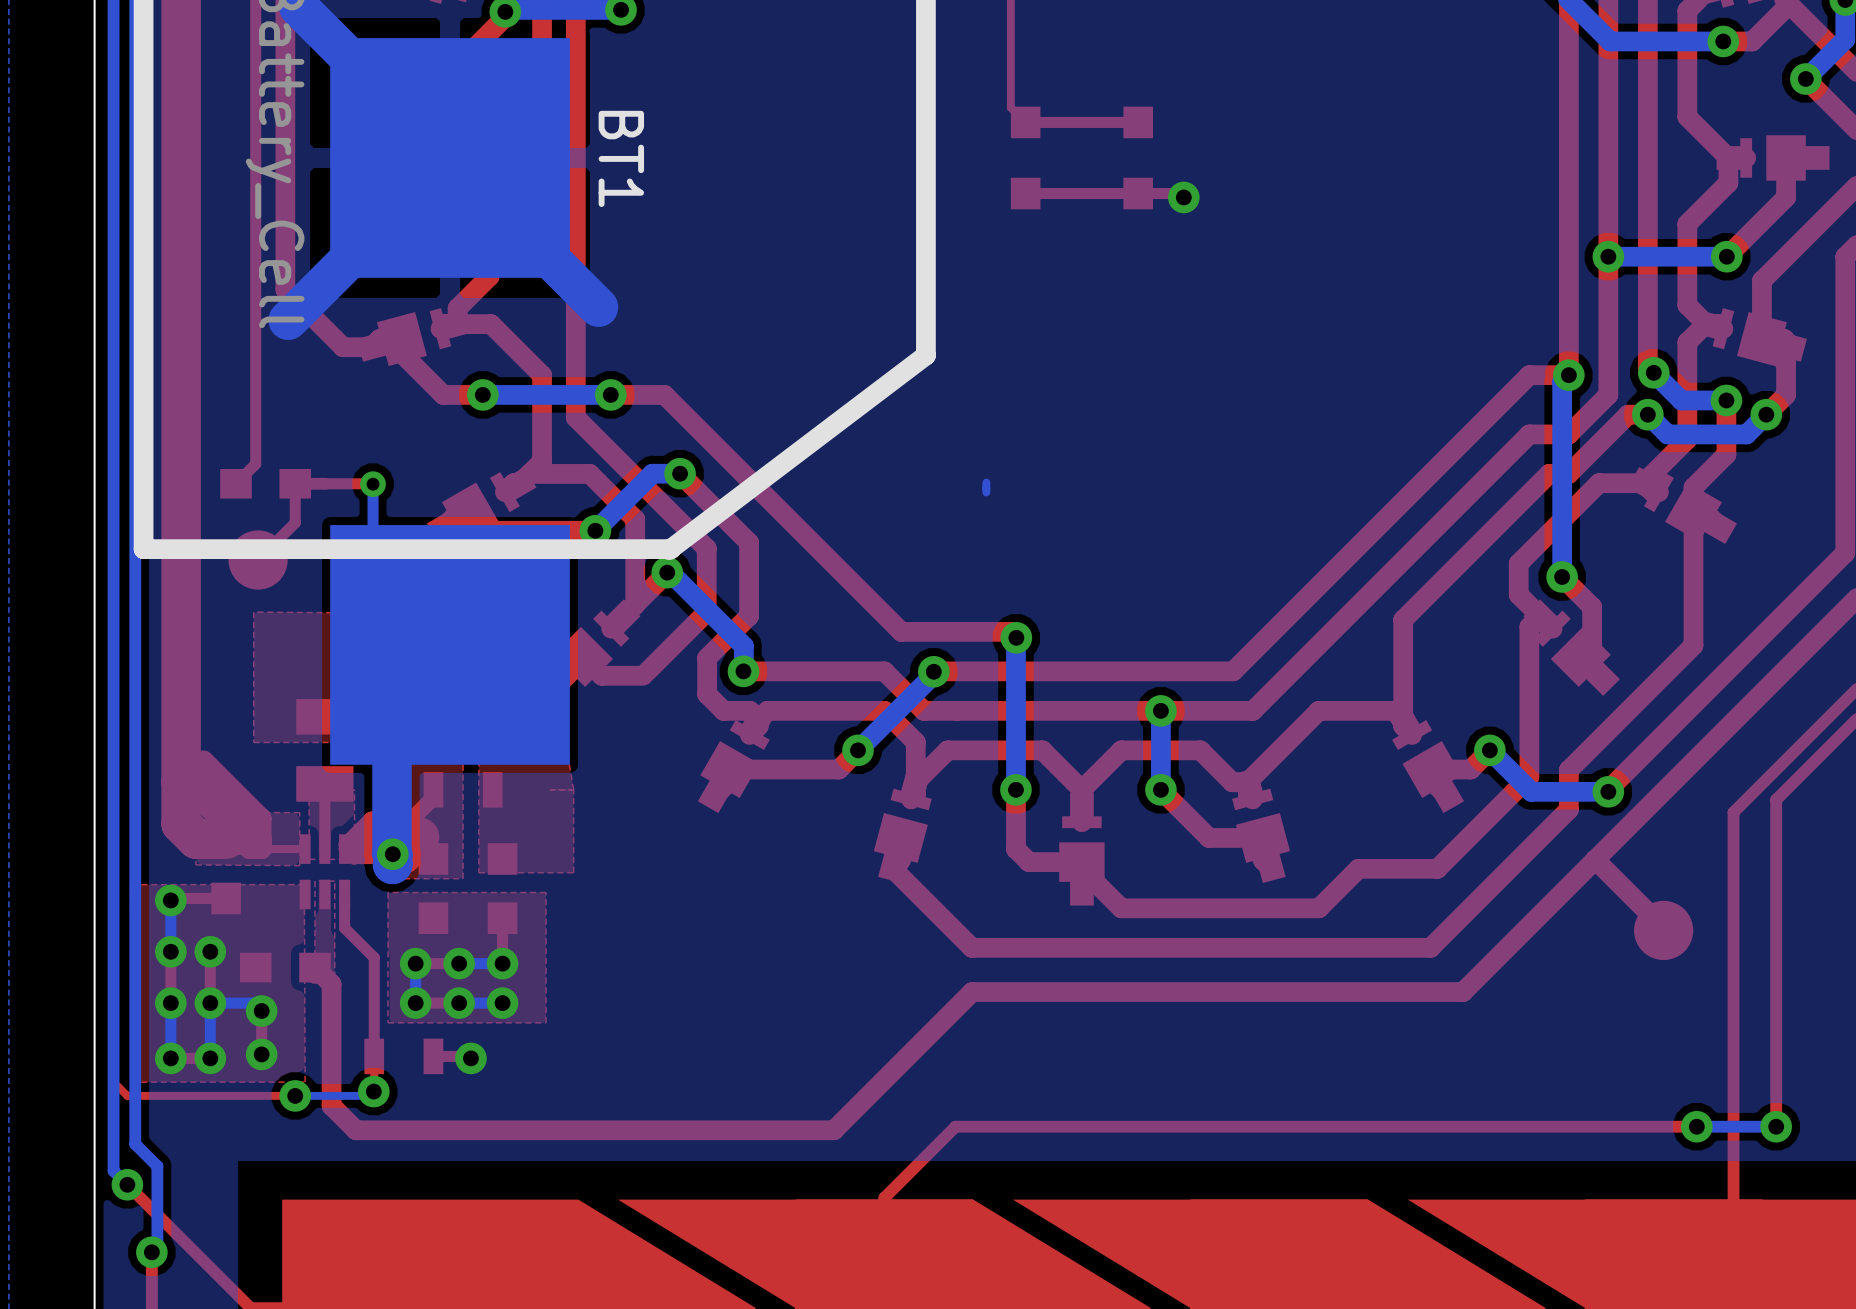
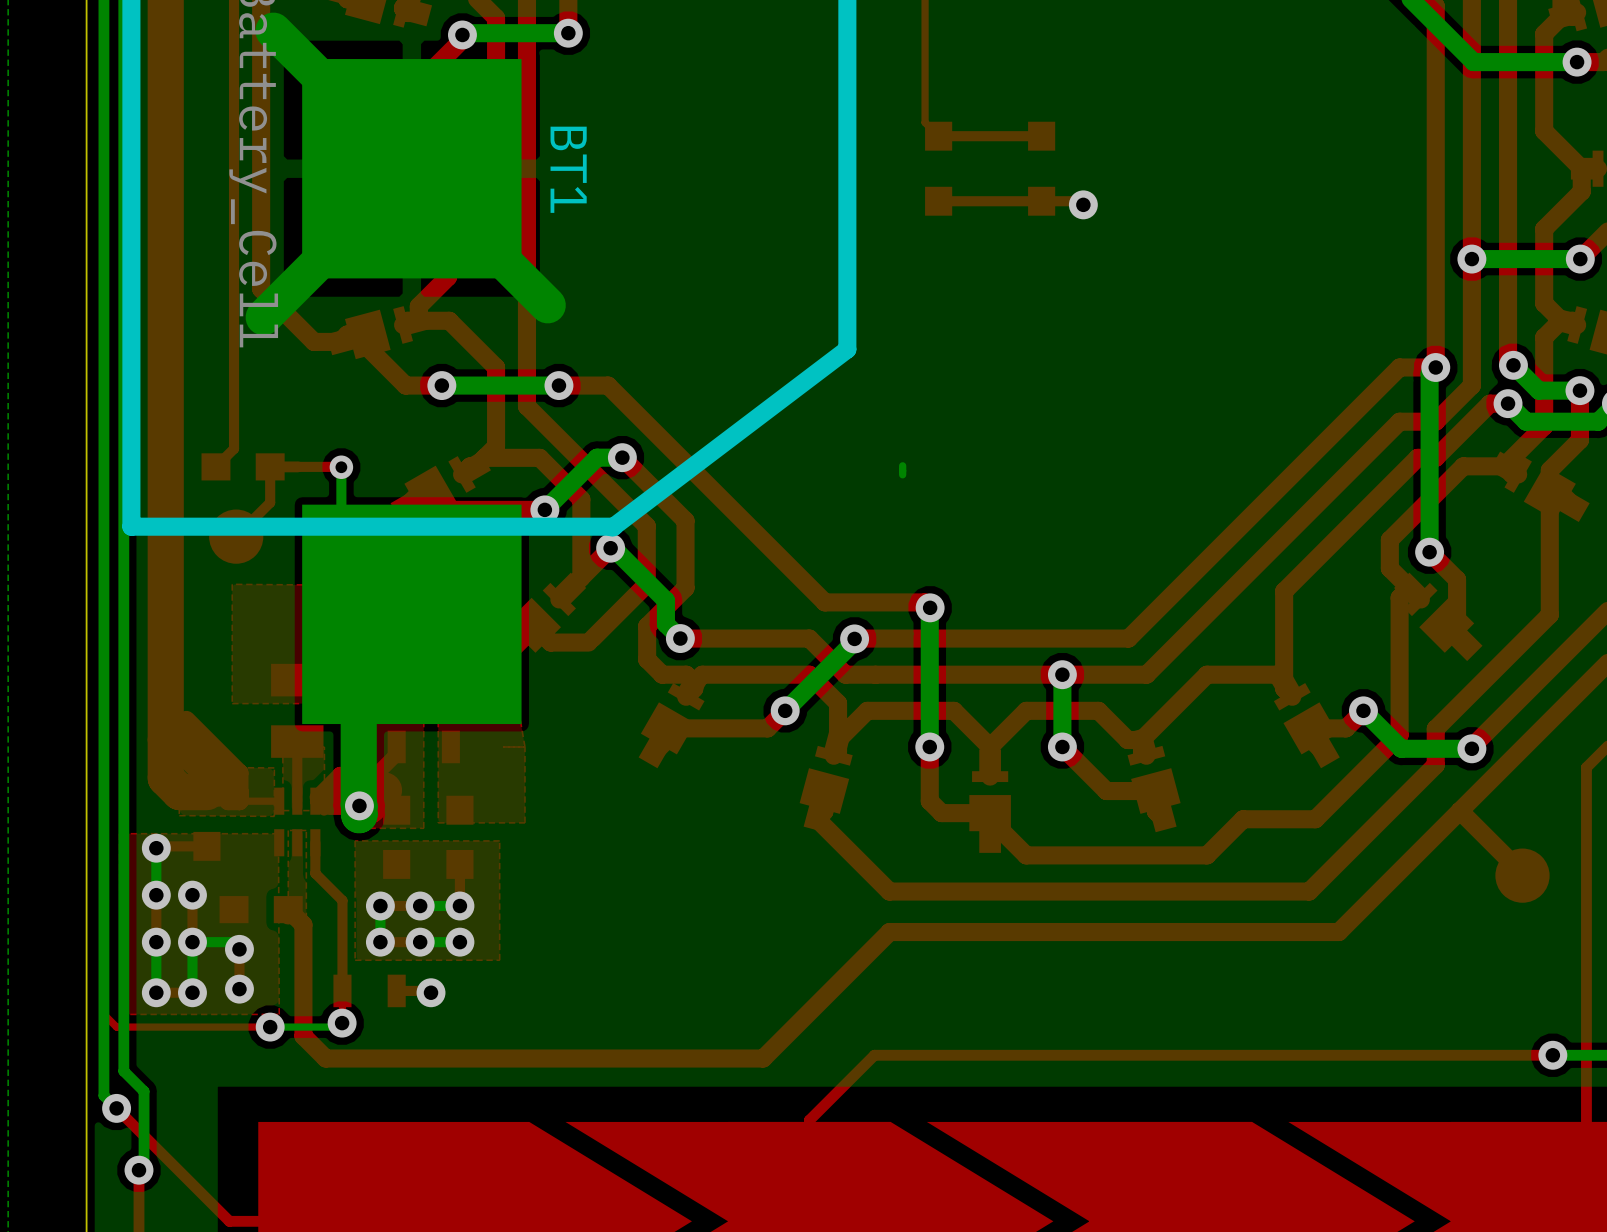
bottom track: (727, 629) (743, 646) (743, 670) -> (665, 600) (665, 624) (680, 638)

